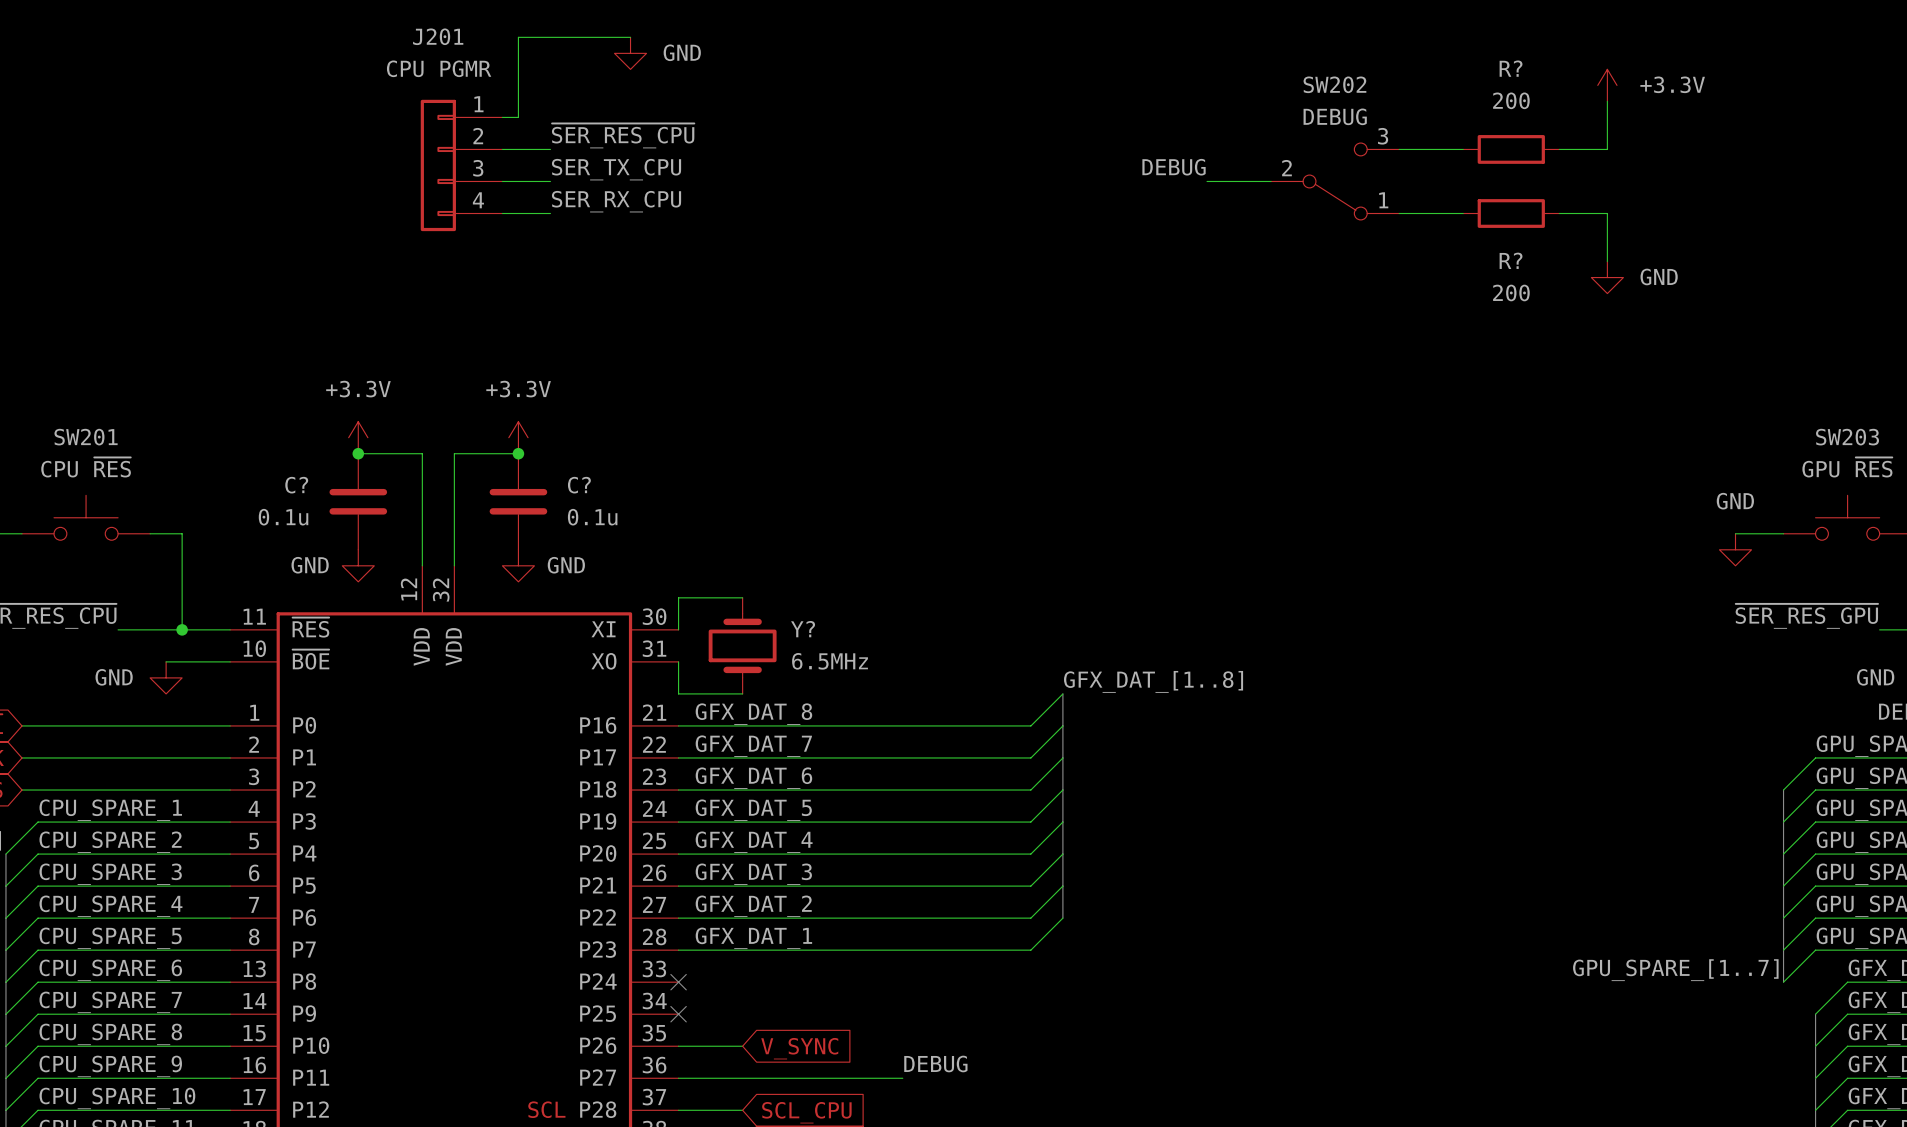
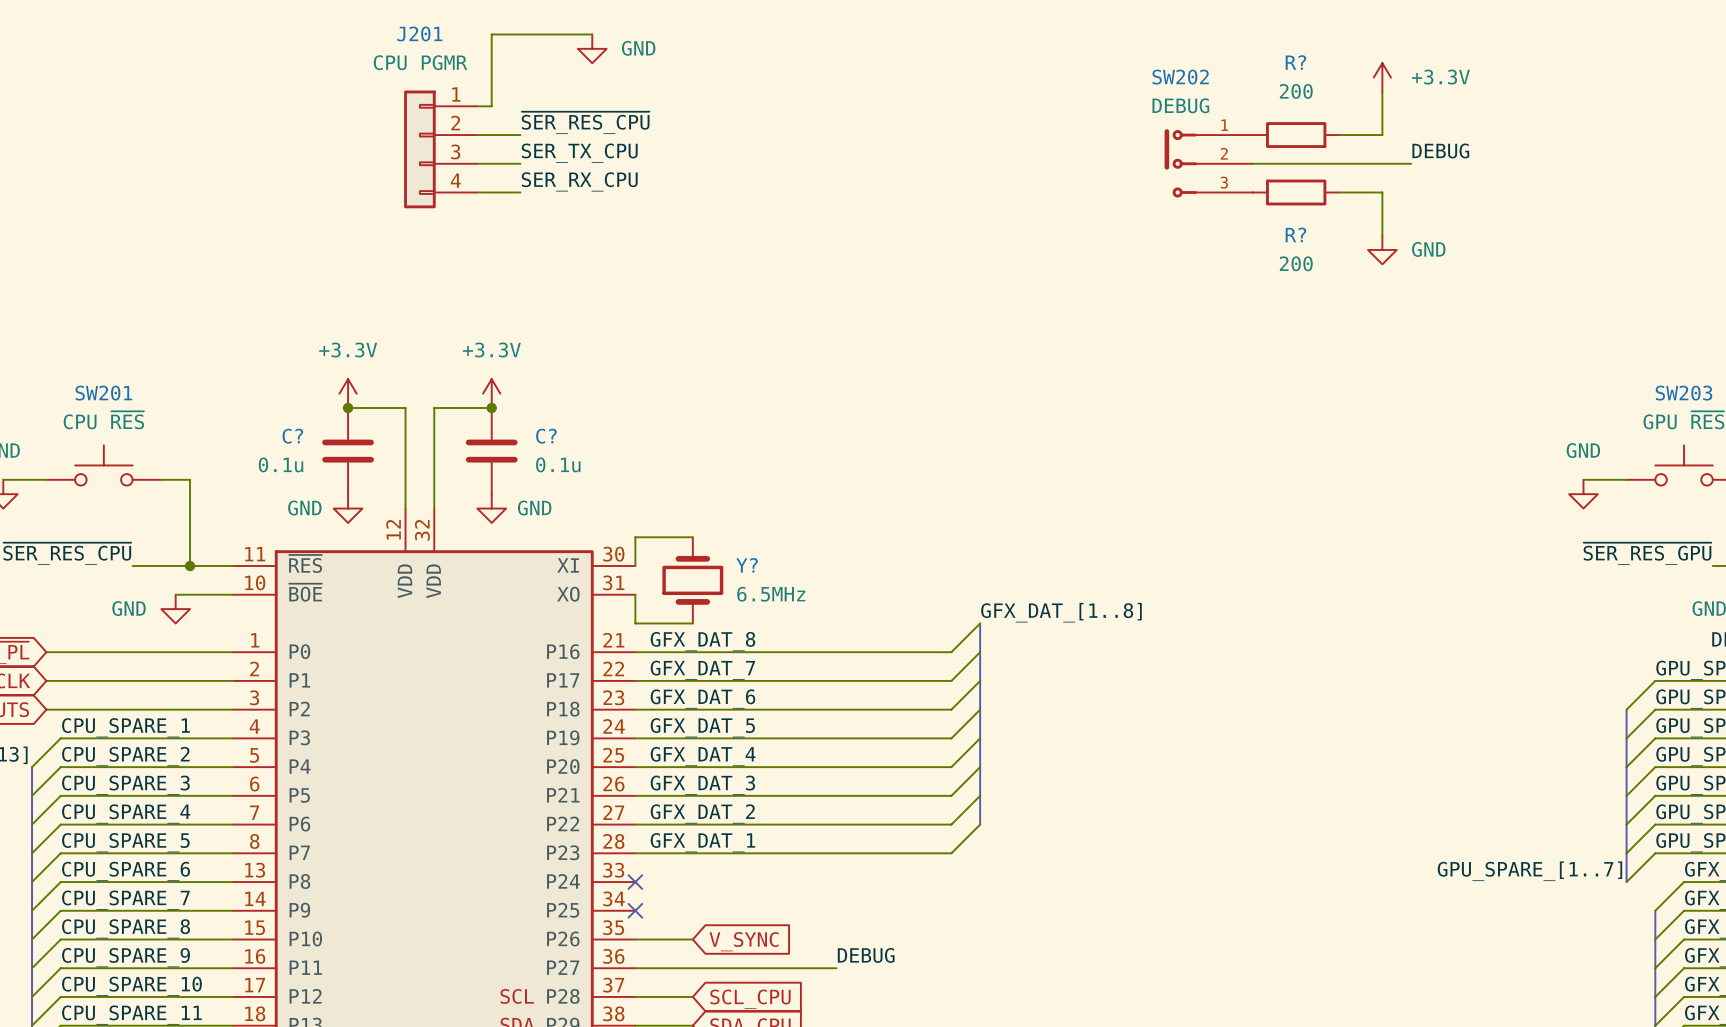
SW202 name position: SW202 (1334, 84) -> SW202 (1180, 77)
power symbol position: +3.3V (1607, 85) -> +3.3V (1382, 77)
wire: (1607, 101) (1607, 149) (1559, 149) -> none
SW202 value position: DEBUG (1335, 116) -> DEBUG (1180, 105)
SW202 symbol: [1271, 143, 1400, 220] -> [1164, 129, 1254, 198]
wire: (1399, 149) (1463, 149) -> (1382, 91) (1382, 135) (1339, 135)
R?: none -> 200 (1296, 135)
R?: 200 (1511, 149) -> none
label: DEBUG (1174, 167) -> none
label: none -> DEBUG (1440, 150)
wire: (1207, 181) (1271, 181) -> none
wire: none -> (1253, 163) (1411, 163)
wire: (1399, 213) (1463, 213) -> (1382, 235) (1382, 192) (1339, 192)
R?: none -> 200 (1296, 192)
R?: 200 (1511, 213) -> none
wire: (1559, 213) (1607, 213) (1607, 261) -> none
power symbol position: GND (1607, 277) -> GND (1382, 249)

